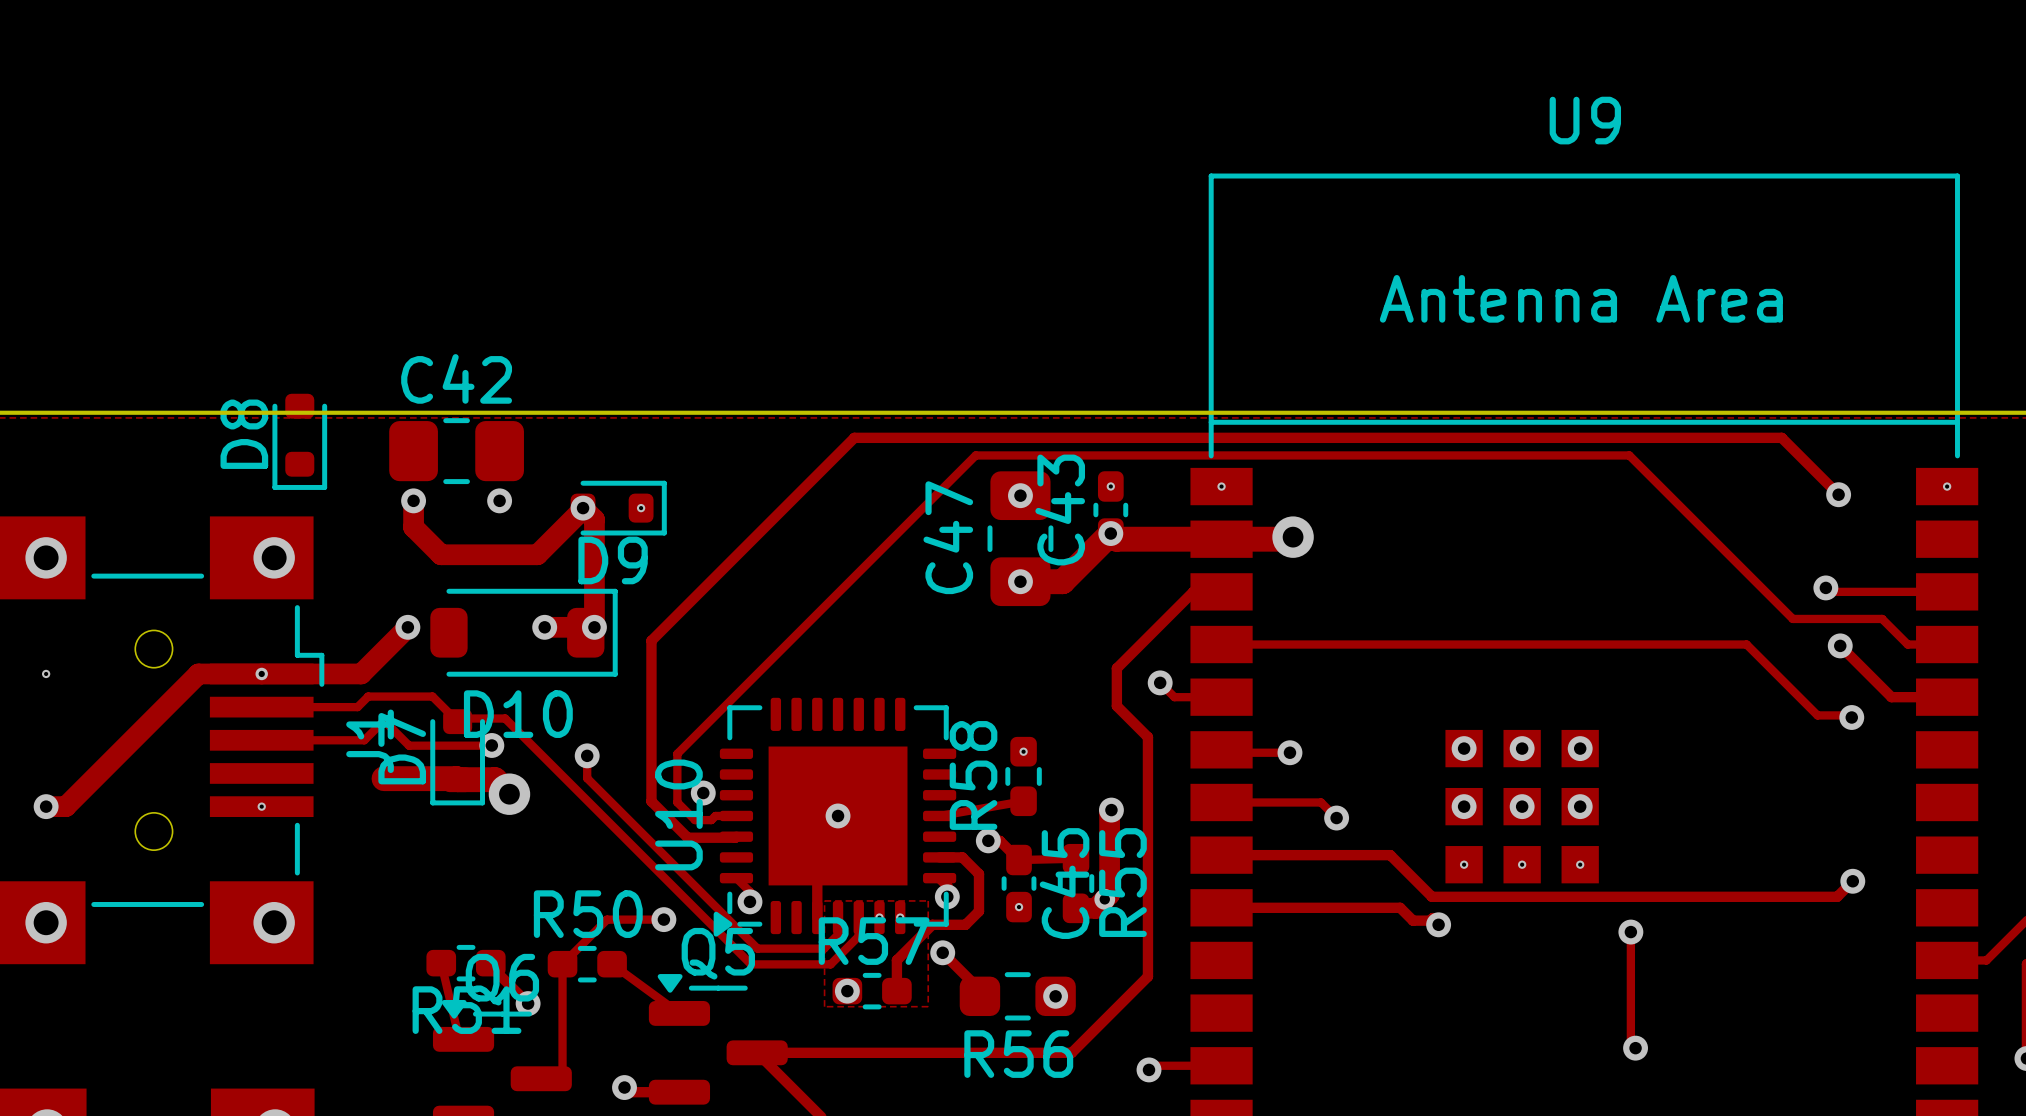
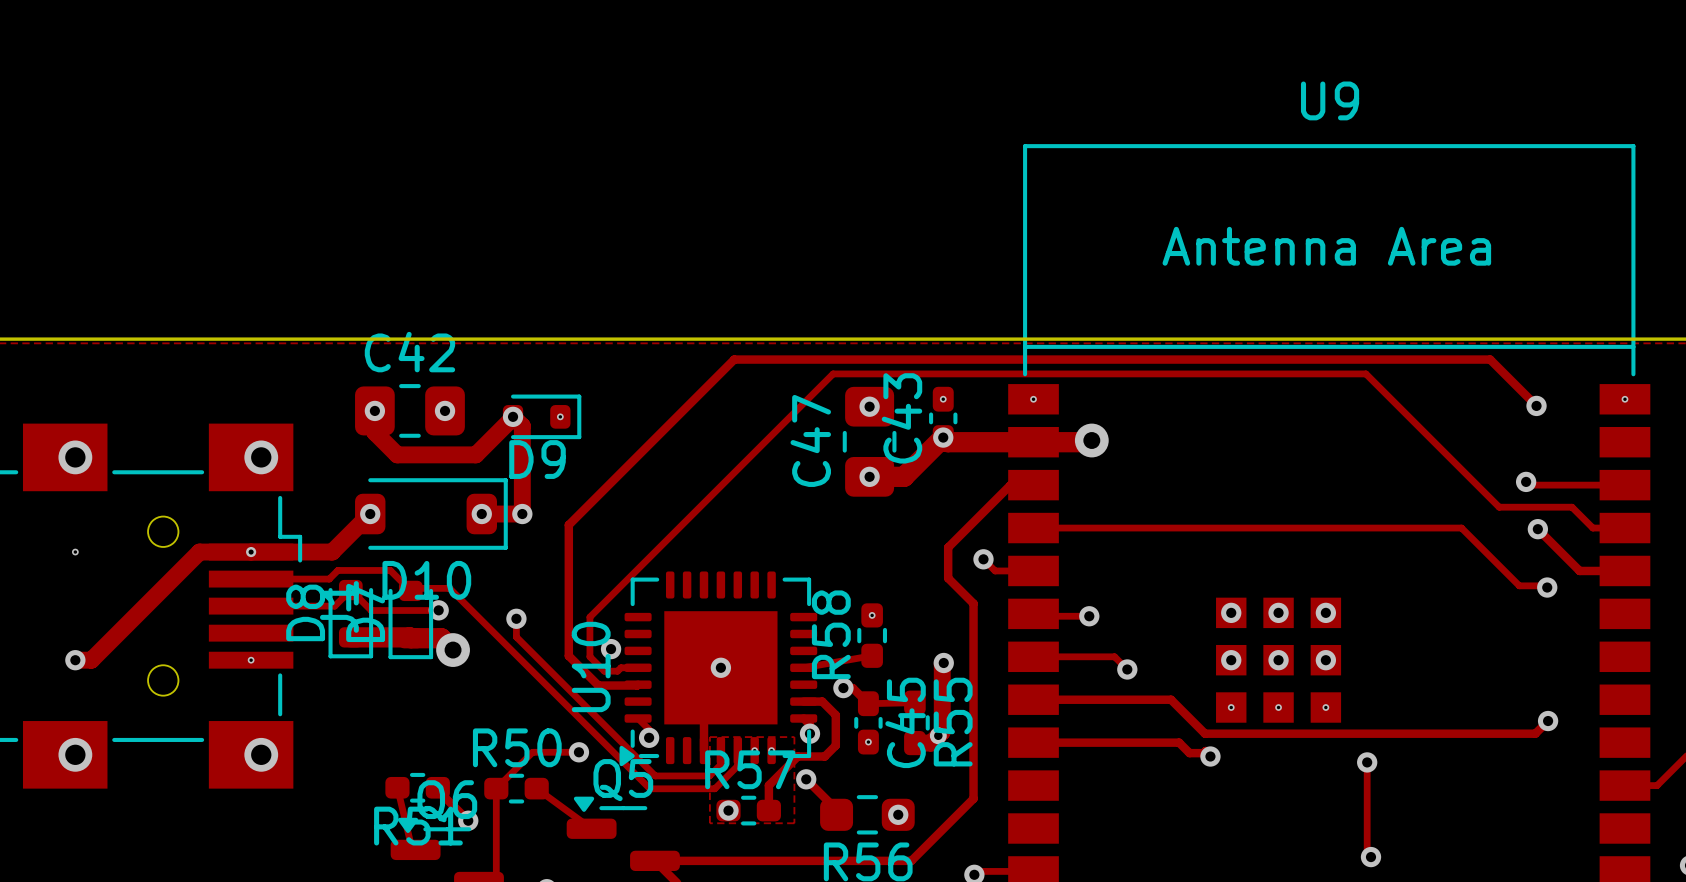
D8 position: (299, 441) -> (350, 619)
C42 position: (456, 451) -> (409, 410)
D10 position: (524, 632) -> (431, 514)

